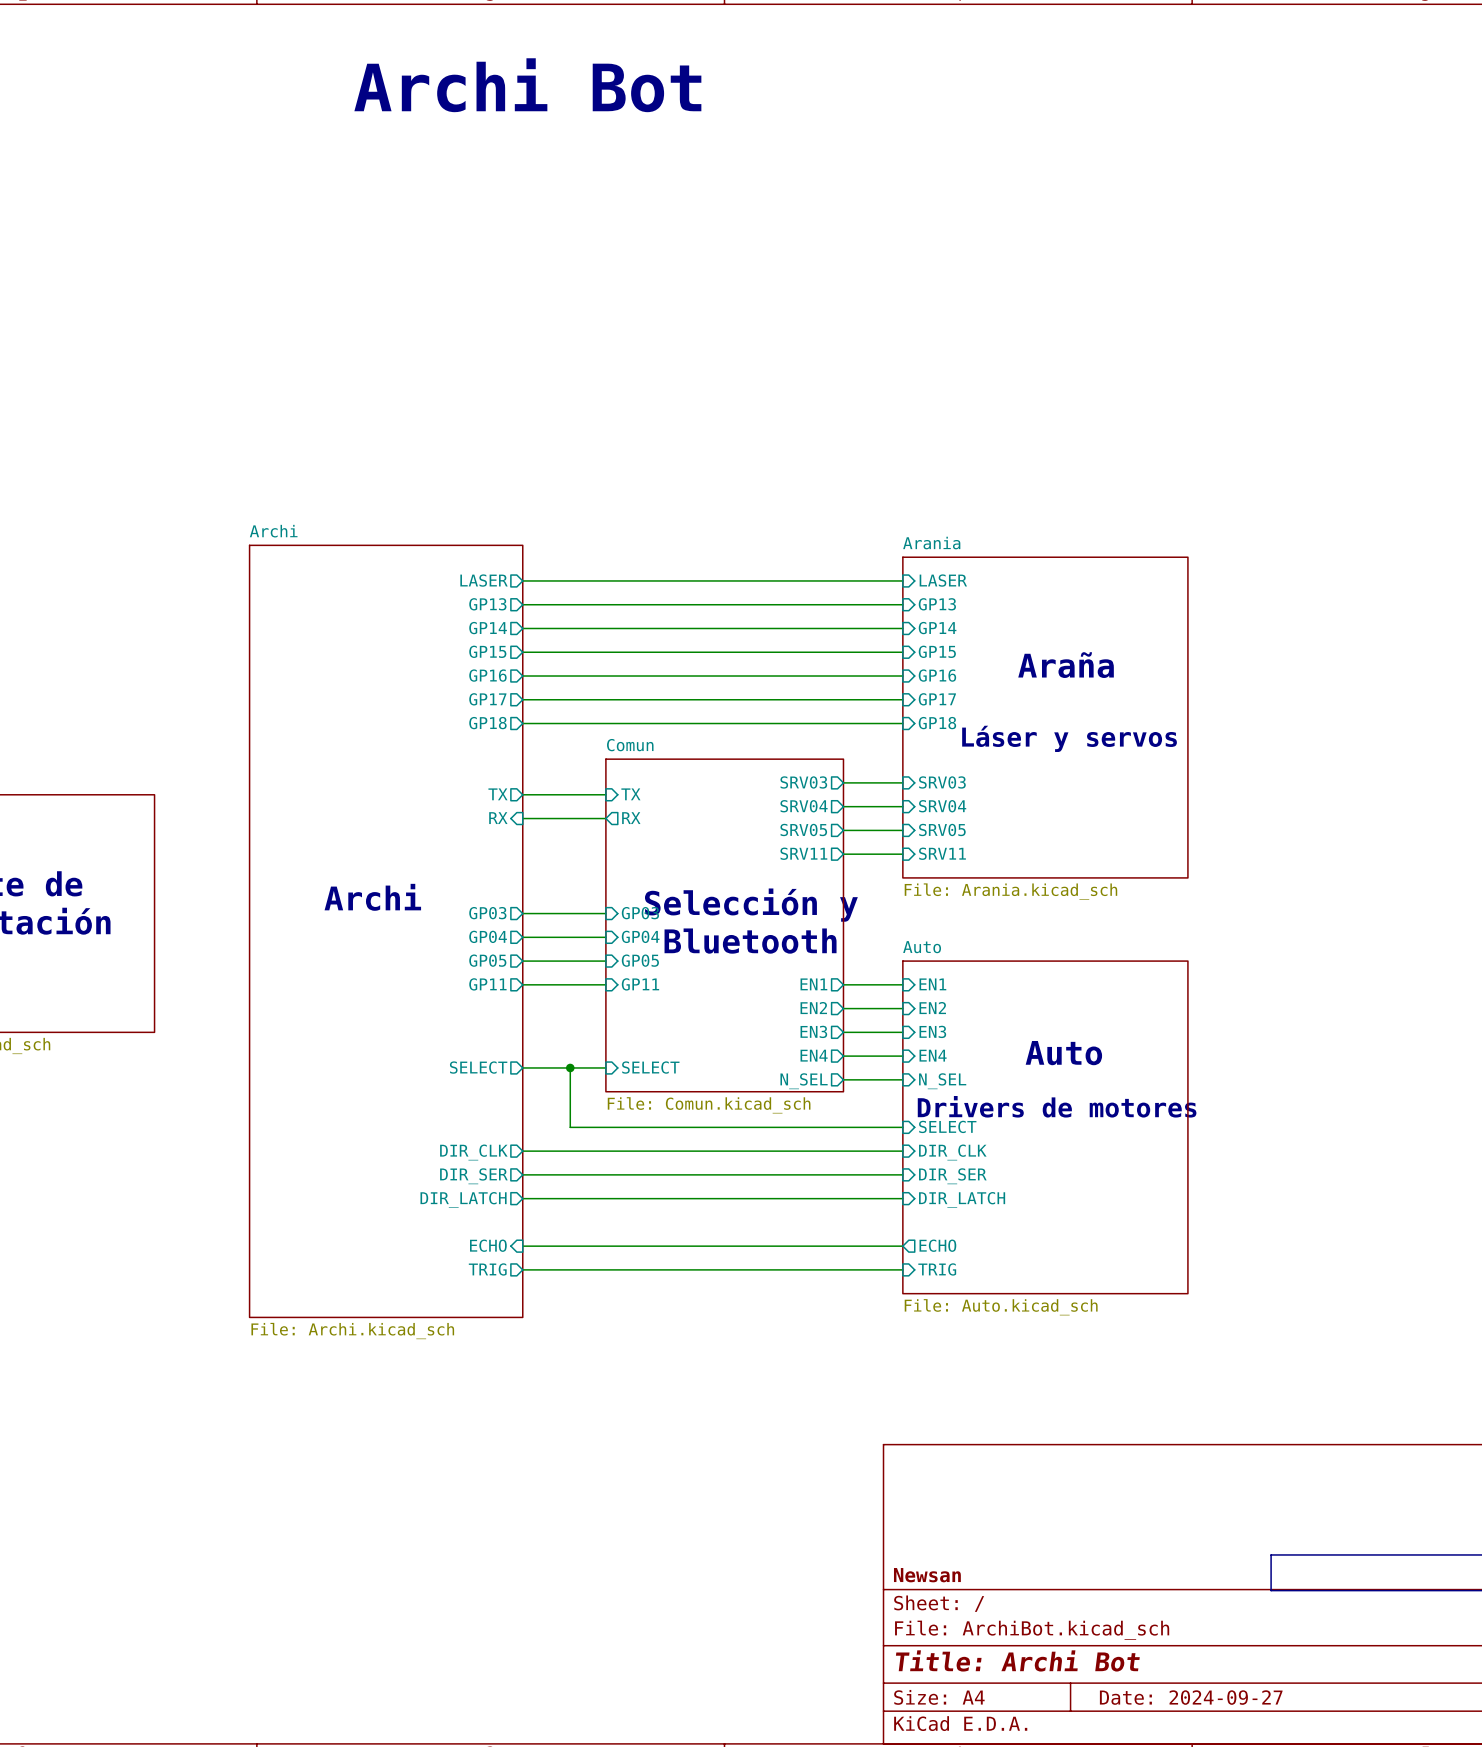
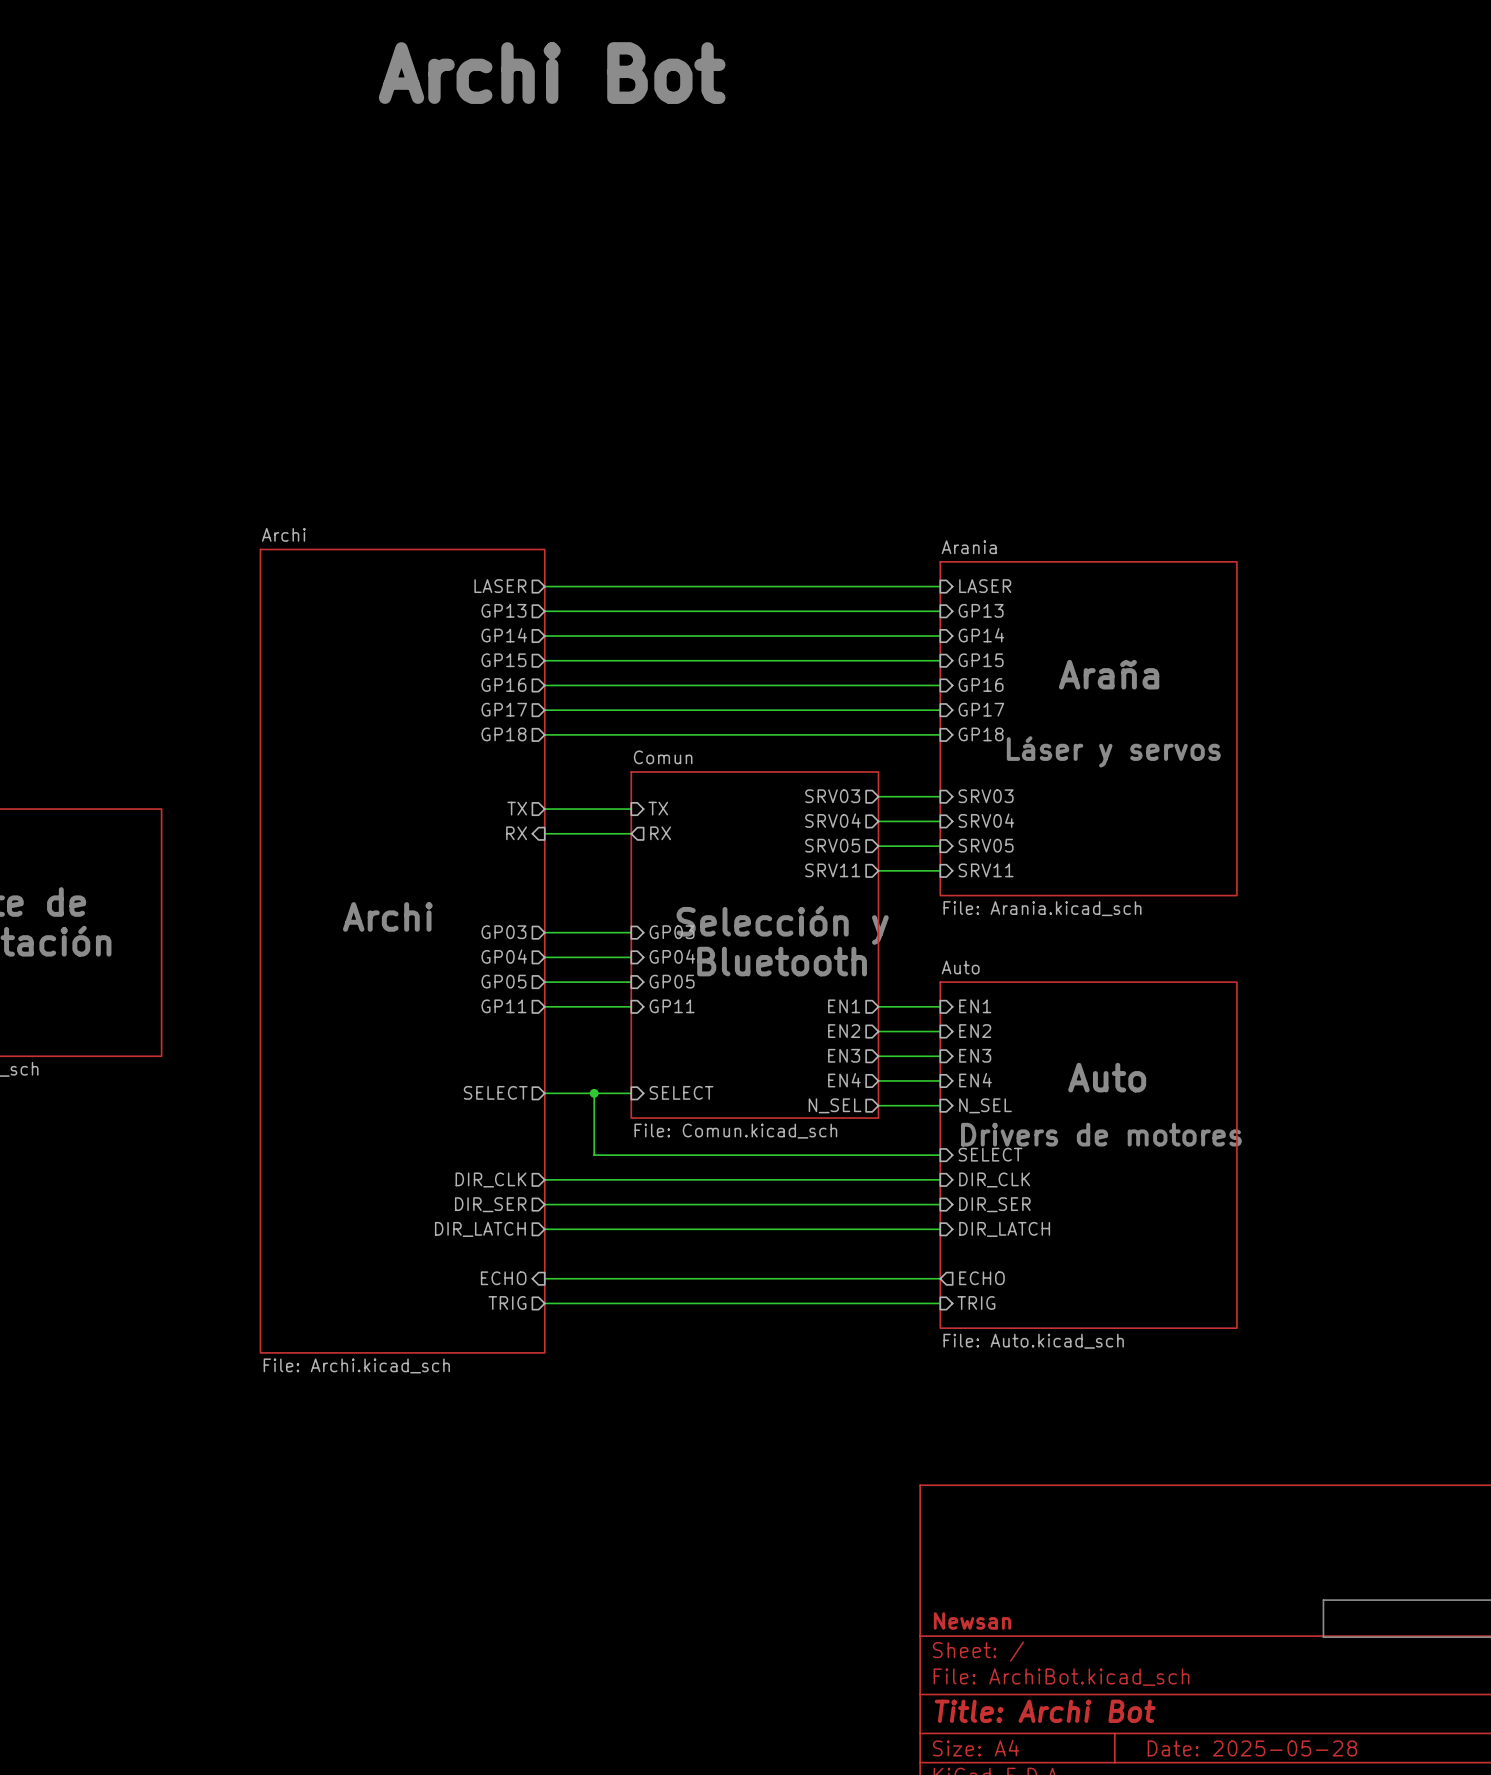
title block: Date: 2024-09-27 (1191, 1697) -> Date: 2025-05-28 (1252, 1748)

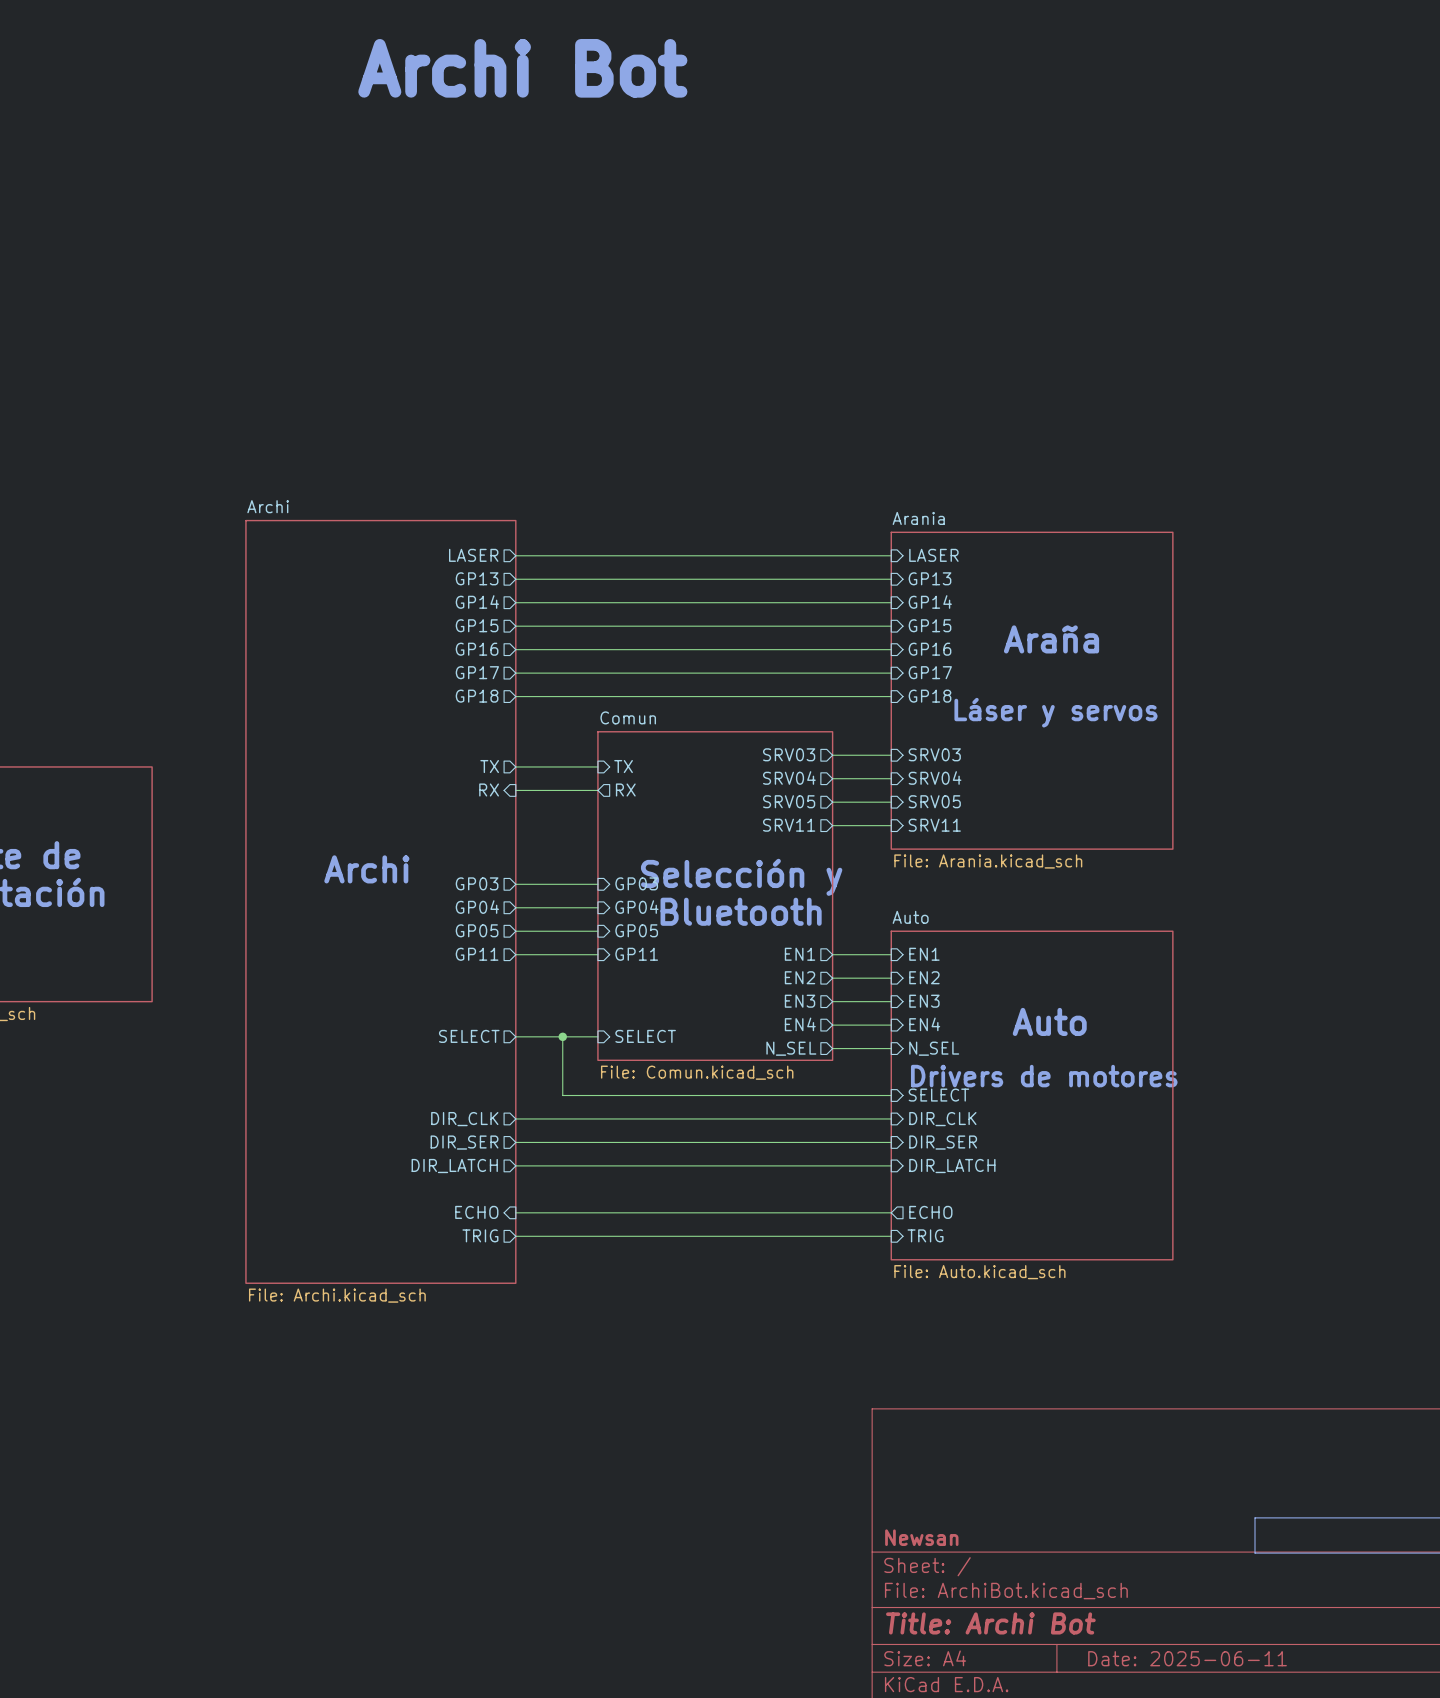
title block: Date: 2025-05-28 (1252, 1748) -> Date: 2025-06-11 (1187, 1658)

